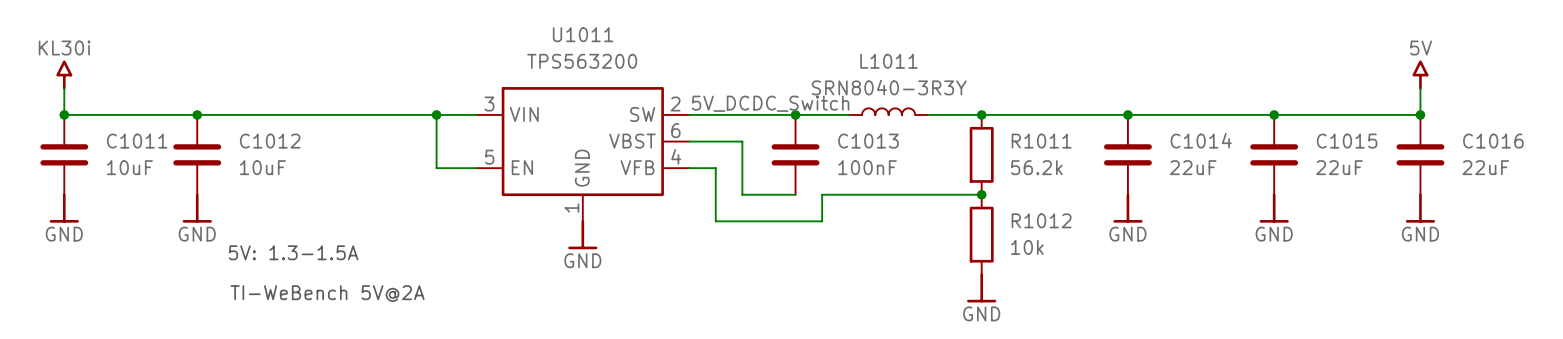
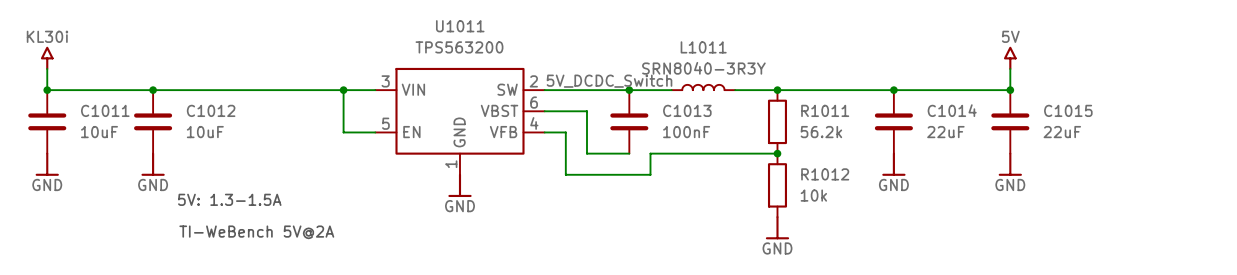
power symbol position: 5V (1420, 75) -> 5V (1010, 58)
wire: (1420, 88) (1420, 114) (1274, 114) -> (1010, 68) (1010, 90)
junction: (1420, 114) -> none
C1016: 22uF (1420, 154) -> none
power symbol: GND (1420, 208) -> none

